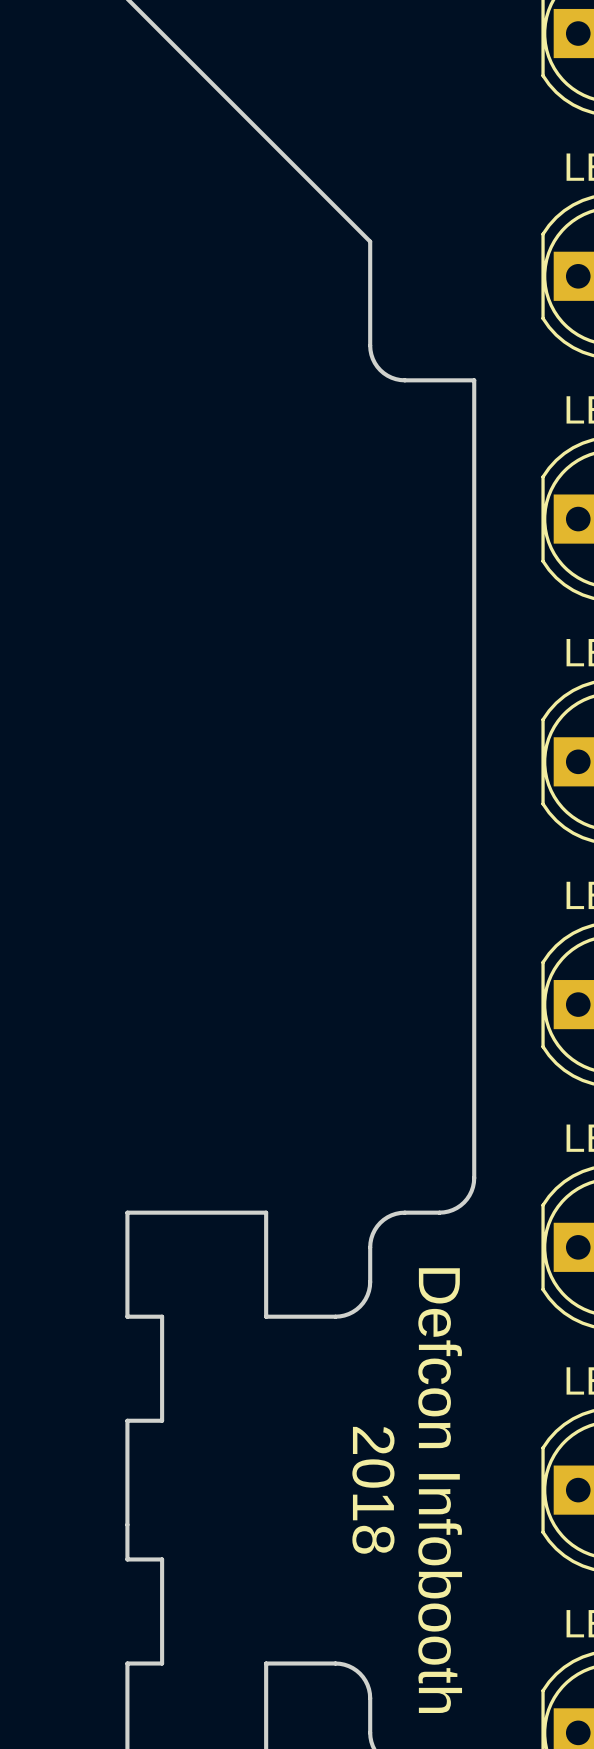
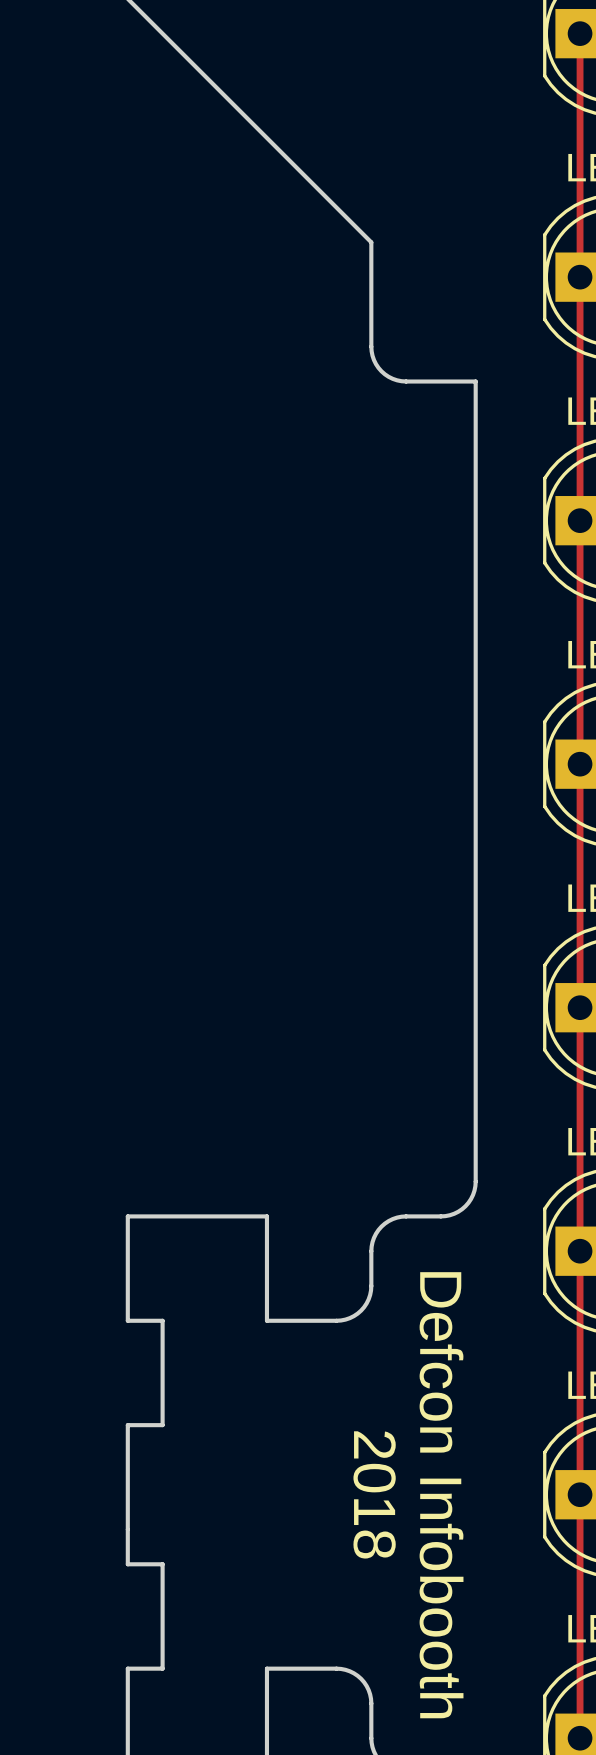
track: none -> (580, 33) (580, 1738)

